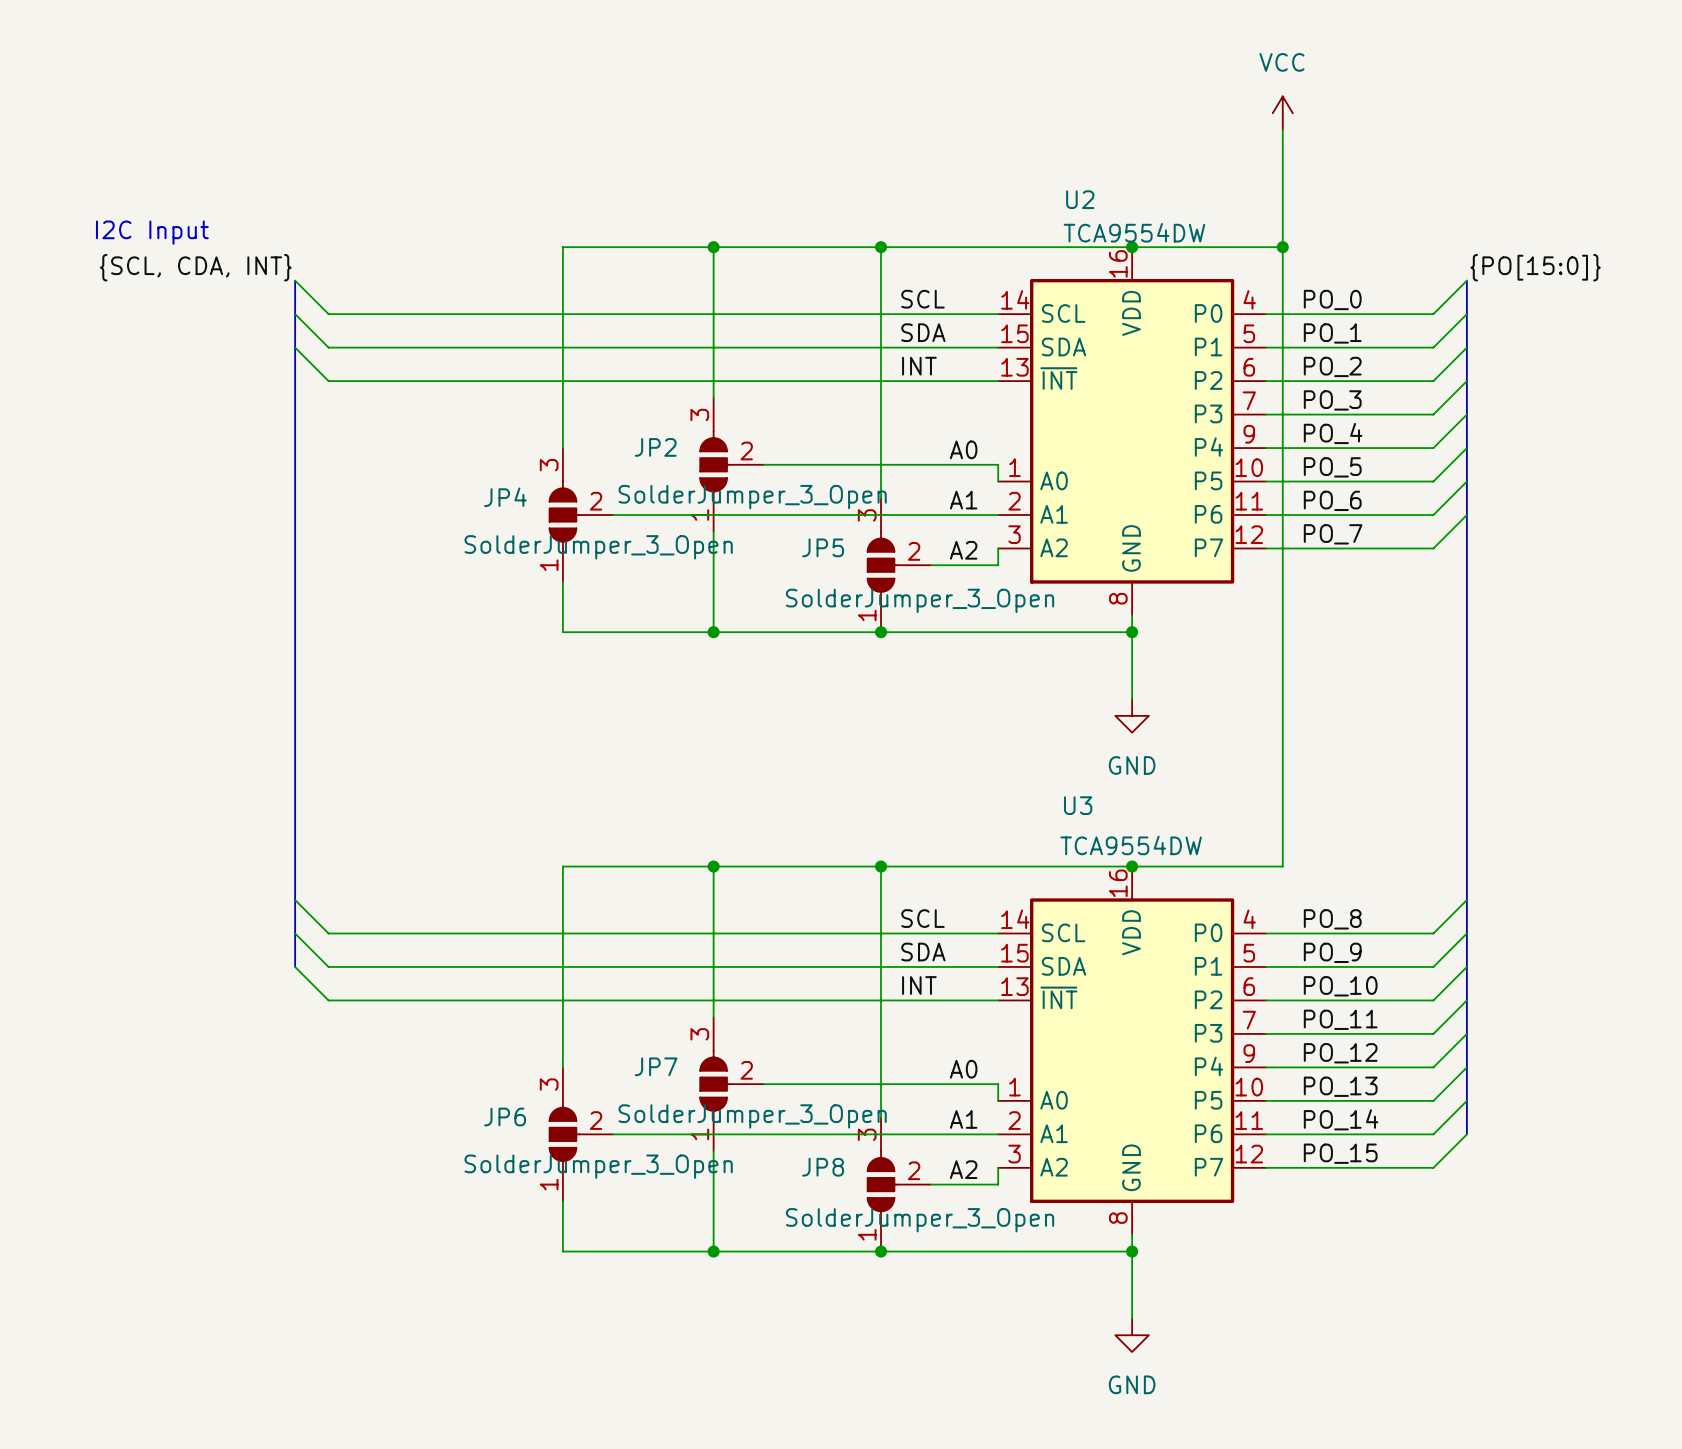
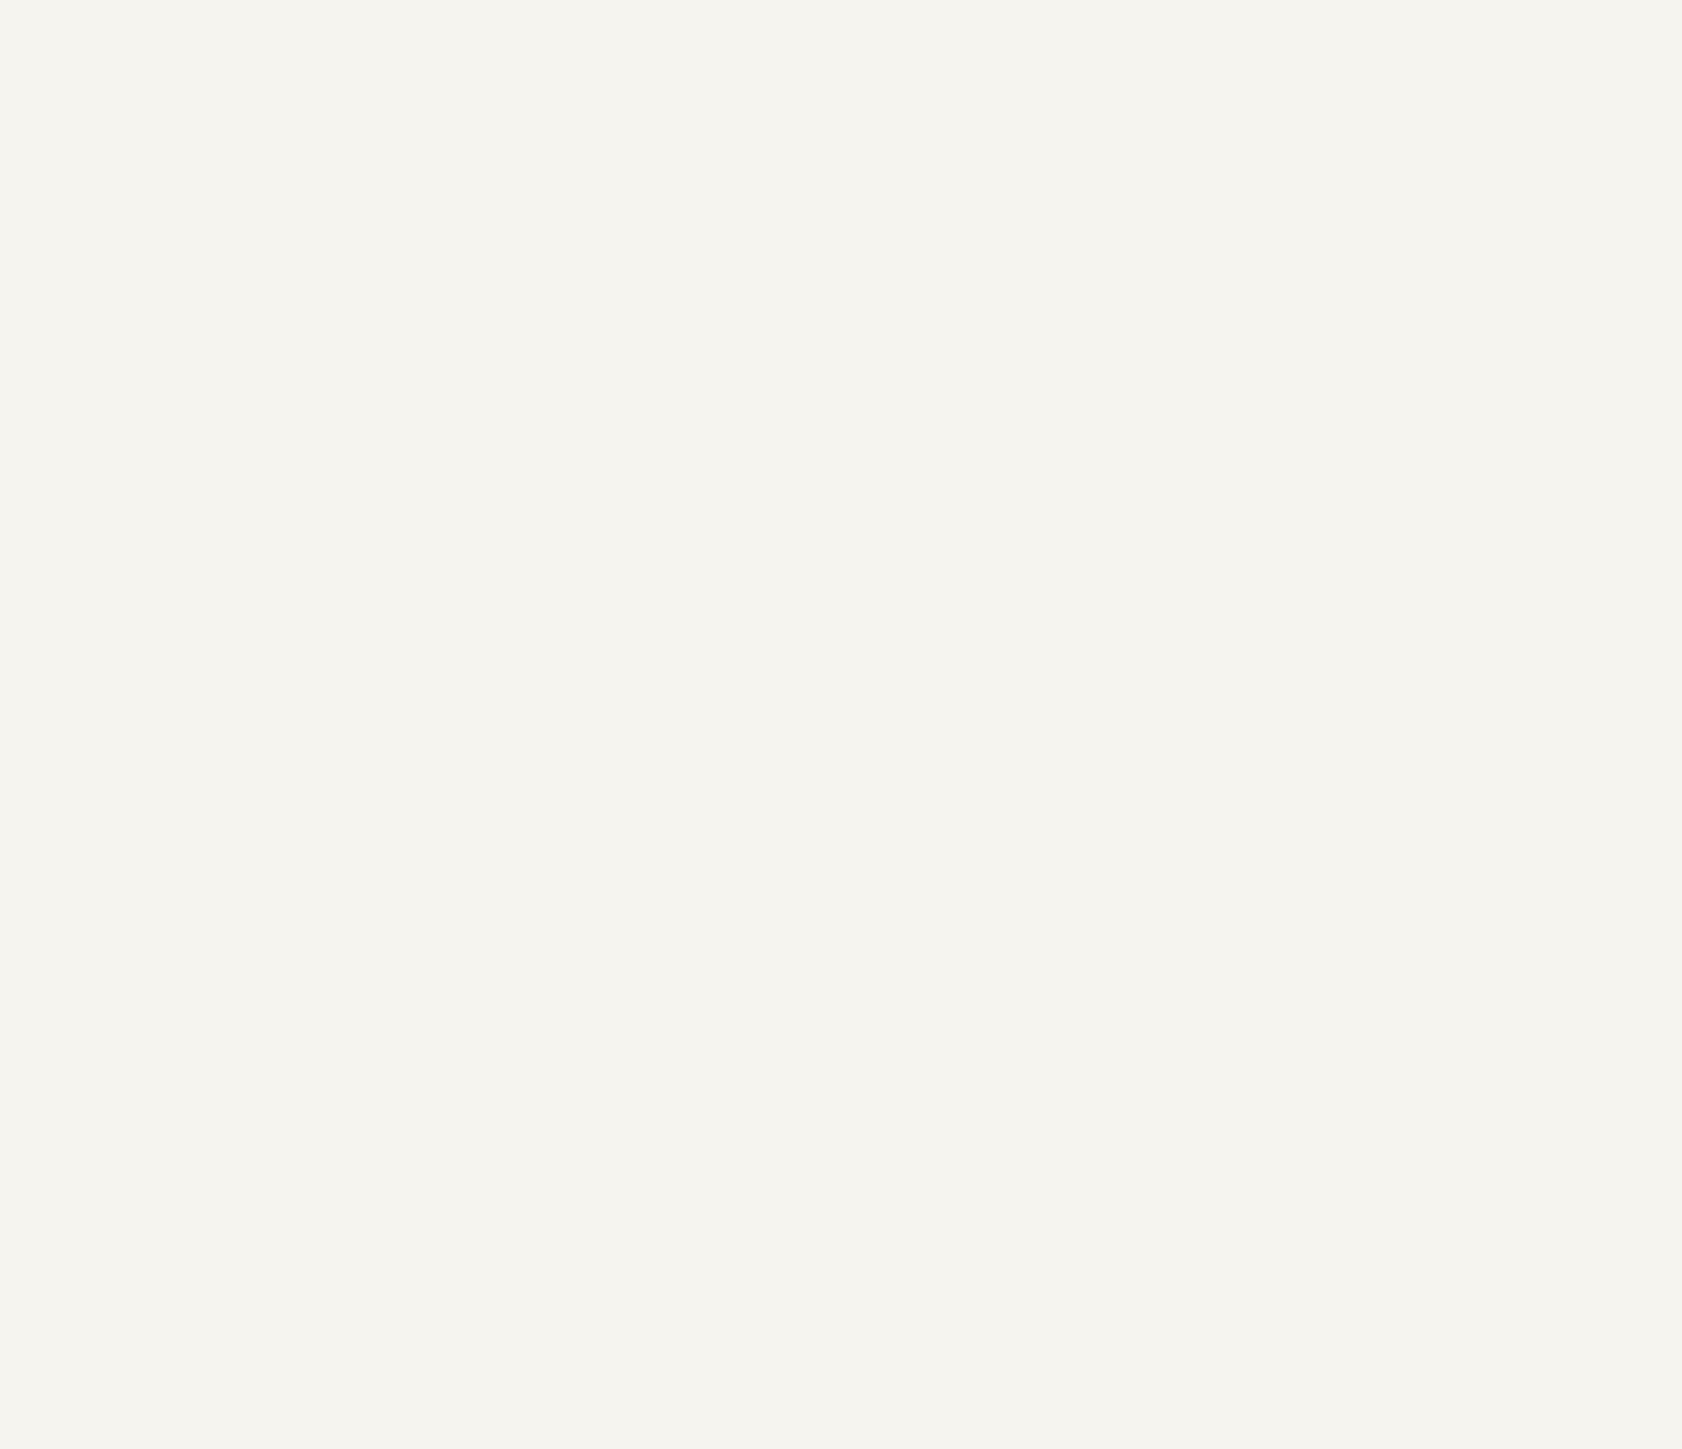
power symbol: VCC (1282, 113) -> none
wire: (1282, 129) (1282, 866) (562, 866) (562, 1067) -> none
text: I2C Input (152, 232) -> none
wire: (713, 247) (713, 397) -> none
junction: (713, 247) -> none
wire: (881, 247) (881, 498) -> none
junction: (881, 247) -> none
junction: (1132, 247) -> none
wire: (1282, 247) (562, 247) (562, 448) -> none
junction: (1282, 247) -> none
label: {SCL, CDA, INT} (195, 267) -> none
label: {PO[15:0]} (1535, 267) -> none
wire: (295, 280) (328, 314) (998, 314) -> none
bus: (295, 280) (295, 966) -> none
wire: (1466, 280) (1433, 314) (1266, 314) -> none
bus: (1466, 280) (1466, 1134) -> none
label: SCL (922, 299) -> none
label: PO_0 (1332, 299) -> none
wire: (295, 314) (328, 347) (998, 347) -> none
wire: (1466, 314) (1433, 347) (1266, 347) -> none
label: SDA (923, 332) -> none
label: PO_1 (1332, 333) -> none
wire: (295, 347) (328, 381) (998, 381) -> none
wire: (1466, 347) (1433, 381) (1266, 381) -> none
label: INT (919, 366) -> none
label: PO_2 (1332, 366) -> none
wire: (1466, 381) (1433, 414) (1266, 414) -> none
label: PO_3 (1332, 400) -> none
wire: (1466, 414) (1433, 448) (1266, 448) -> none
U2: TCA9554DW (1132, 431) -> none
label: PO_4 (1333, 433) -> none
wire: (1466, 448) (1433, 481) (1266, 481) -> none
label: A0 (963, 449) -> none
JP2: SolderJumper_3_Open (732, 464) -> none
wire: (763, 464) (998, 464) (998, 481) -> none
label: PO_5 (1332, 467) -> none
wire: (1466, 481) (1433, 515) (1266, 515) -> none
label: A1 (963, 500) -> none
label: PO_6 (1332, 500) -> none
JP4: SolderJumper_3_Open (581, 515) -> none
wire: (613, 515) (998, 515) -> none
wire: (1466, 515) (1433, 548) (1266, 548) -> none
wire: (713, 531) (713, 632) -> none
label: PO_7 (1333, 534) -> none
wire: (998, 548) (998, 565) (931, 565) -> none
label: A2 (963, 550) -> none
JP5: SolderJumper_3_Open (899, 565) -> none
wire: (562, 581) (562, 632) (1132, 632) -> none
wire: (1132, 615) (1132, 699) -> none
junction: (713, 632) -> none
junction: (881, 632) -> none
junction: (1132, 632) -> none
power symbol: GND (1132, 715) -> none
wire: (713, 866) (713, 1017) -> none
junction: (713, 866) -> none
wire: (881, 866) (881, 1117) -> none
junction: (881, 866) -> none
junction: (1132, 866) -> none
wire: (295, 900) (328, 933) (998, 933) -> none
wire: (1466, 900) (1433, 933) (1266, 933) -> none
label: SCL (922, 918) -> none
label: PO_8 (1332, 919) -> none
wire: (295, 933) (328, 966) (998, 966) -> none
wire: (1466, 933) (1433, 966) (1266, 966) -> none
label: SDA (923, 952) -> none
label: PO_9 (1332, 952) -> none
wire: (295, 966) (328, 1000) (998, 1000) -> none
wire: (1466, 966) (1433, 1000) (1266, 1000) -> none
label: INT (919, 985) -> none
label: PO_10 (1340, 986) -> none
wire: (1466, 1000) (1433, 1033) (1266, 1033) -> none
label: PO_11 (1340, 1019) -> none
wire: (1466, 1033) (1433, 1067) (1266, 1067) -> none
U3: TCA9554DW (1132, 1050) -> none
label: PO_12 (1340, 1053) -> none
wire: (1466, 1067) (1433, 1100) (1266, 1100) -> none
label: A0 (963, 1069) -> none
JP7: SolderJumper_3_Open (732, 1084) -> none
wire: (763, 1084) (998, 1084) (998, 1100) -> none
label: PO_13 (1340, 1086) -> none
wire: (1466, 1100) (1433, 1134) (1266, 1134) -> none
label: A1 (963, 1119) -> none
label: PO_14 (1341, 1119) -> none
JP6: SolderJumper_3_Open (581, 1134) -> none
wire: (613, 1134) (998, 1134) -> none
wire: (1466, 1134) (1433, 1167) (1266, 1167) -> none
wire: (713, 1151) (713, 1251) -> none
label: PO_15 (1340, 1153) -> none
wire: (998, 1167) (998, 1184) (931, 1184) -> none
label: A2 (963, 1169) -> none
JP8: SolderJumper_3_Open (899, 1184) -> none
wire: (562, 1201) (562, 1251) (1132, 1251) -> none
wire: (1132, 1234) (1132, 1318) -> none
junction: (713, 1251) -> none
junction: (881, 1251) -> none
junction: (1132, 1251) -> none
power symbol: GND (1132, 1335) -> none

